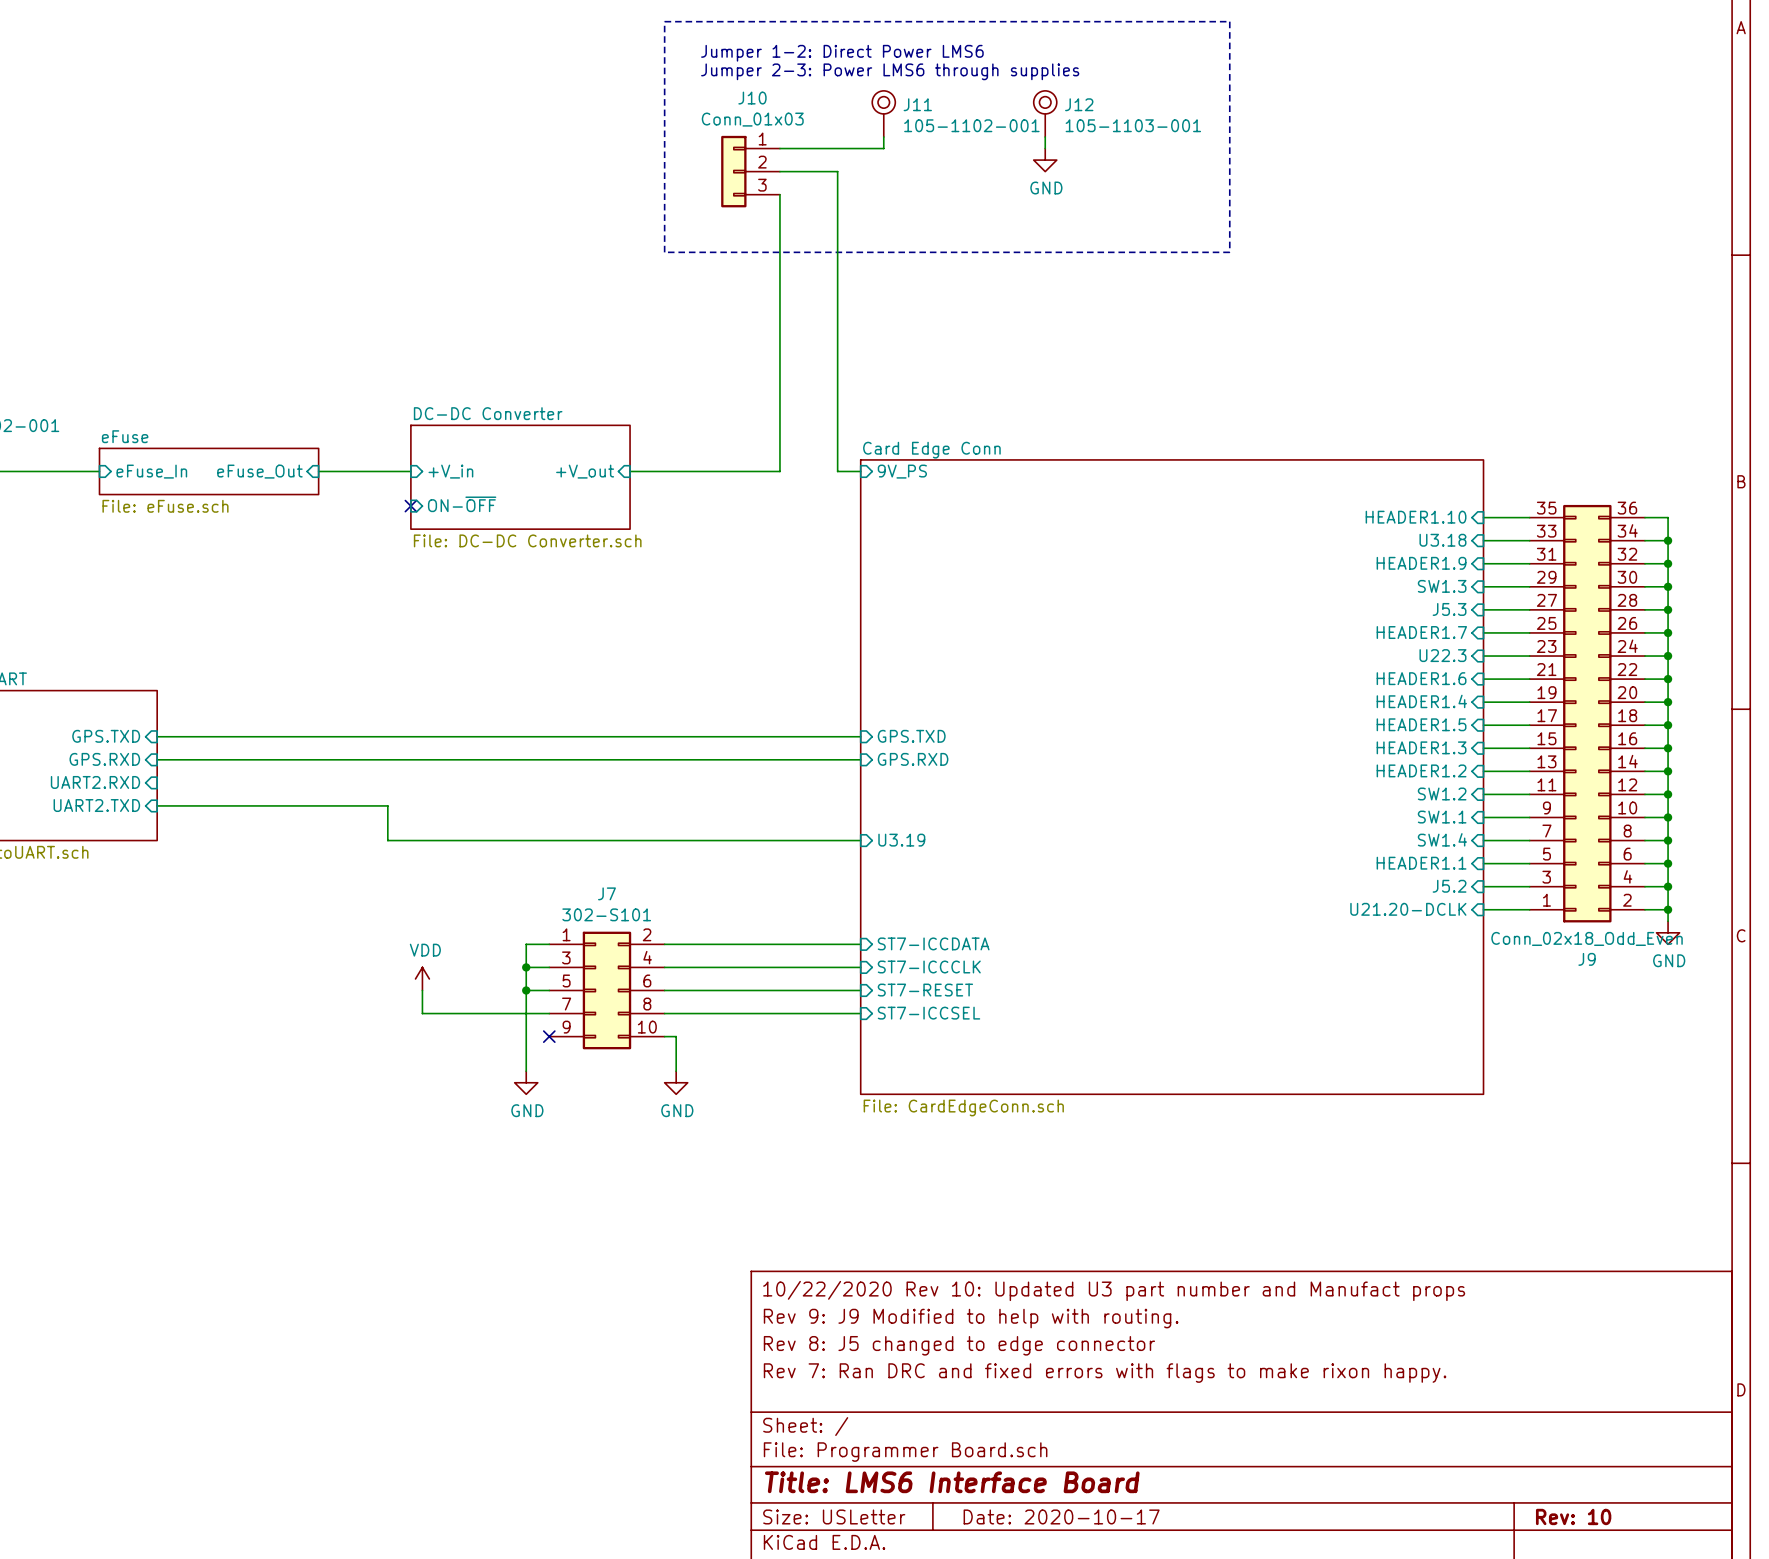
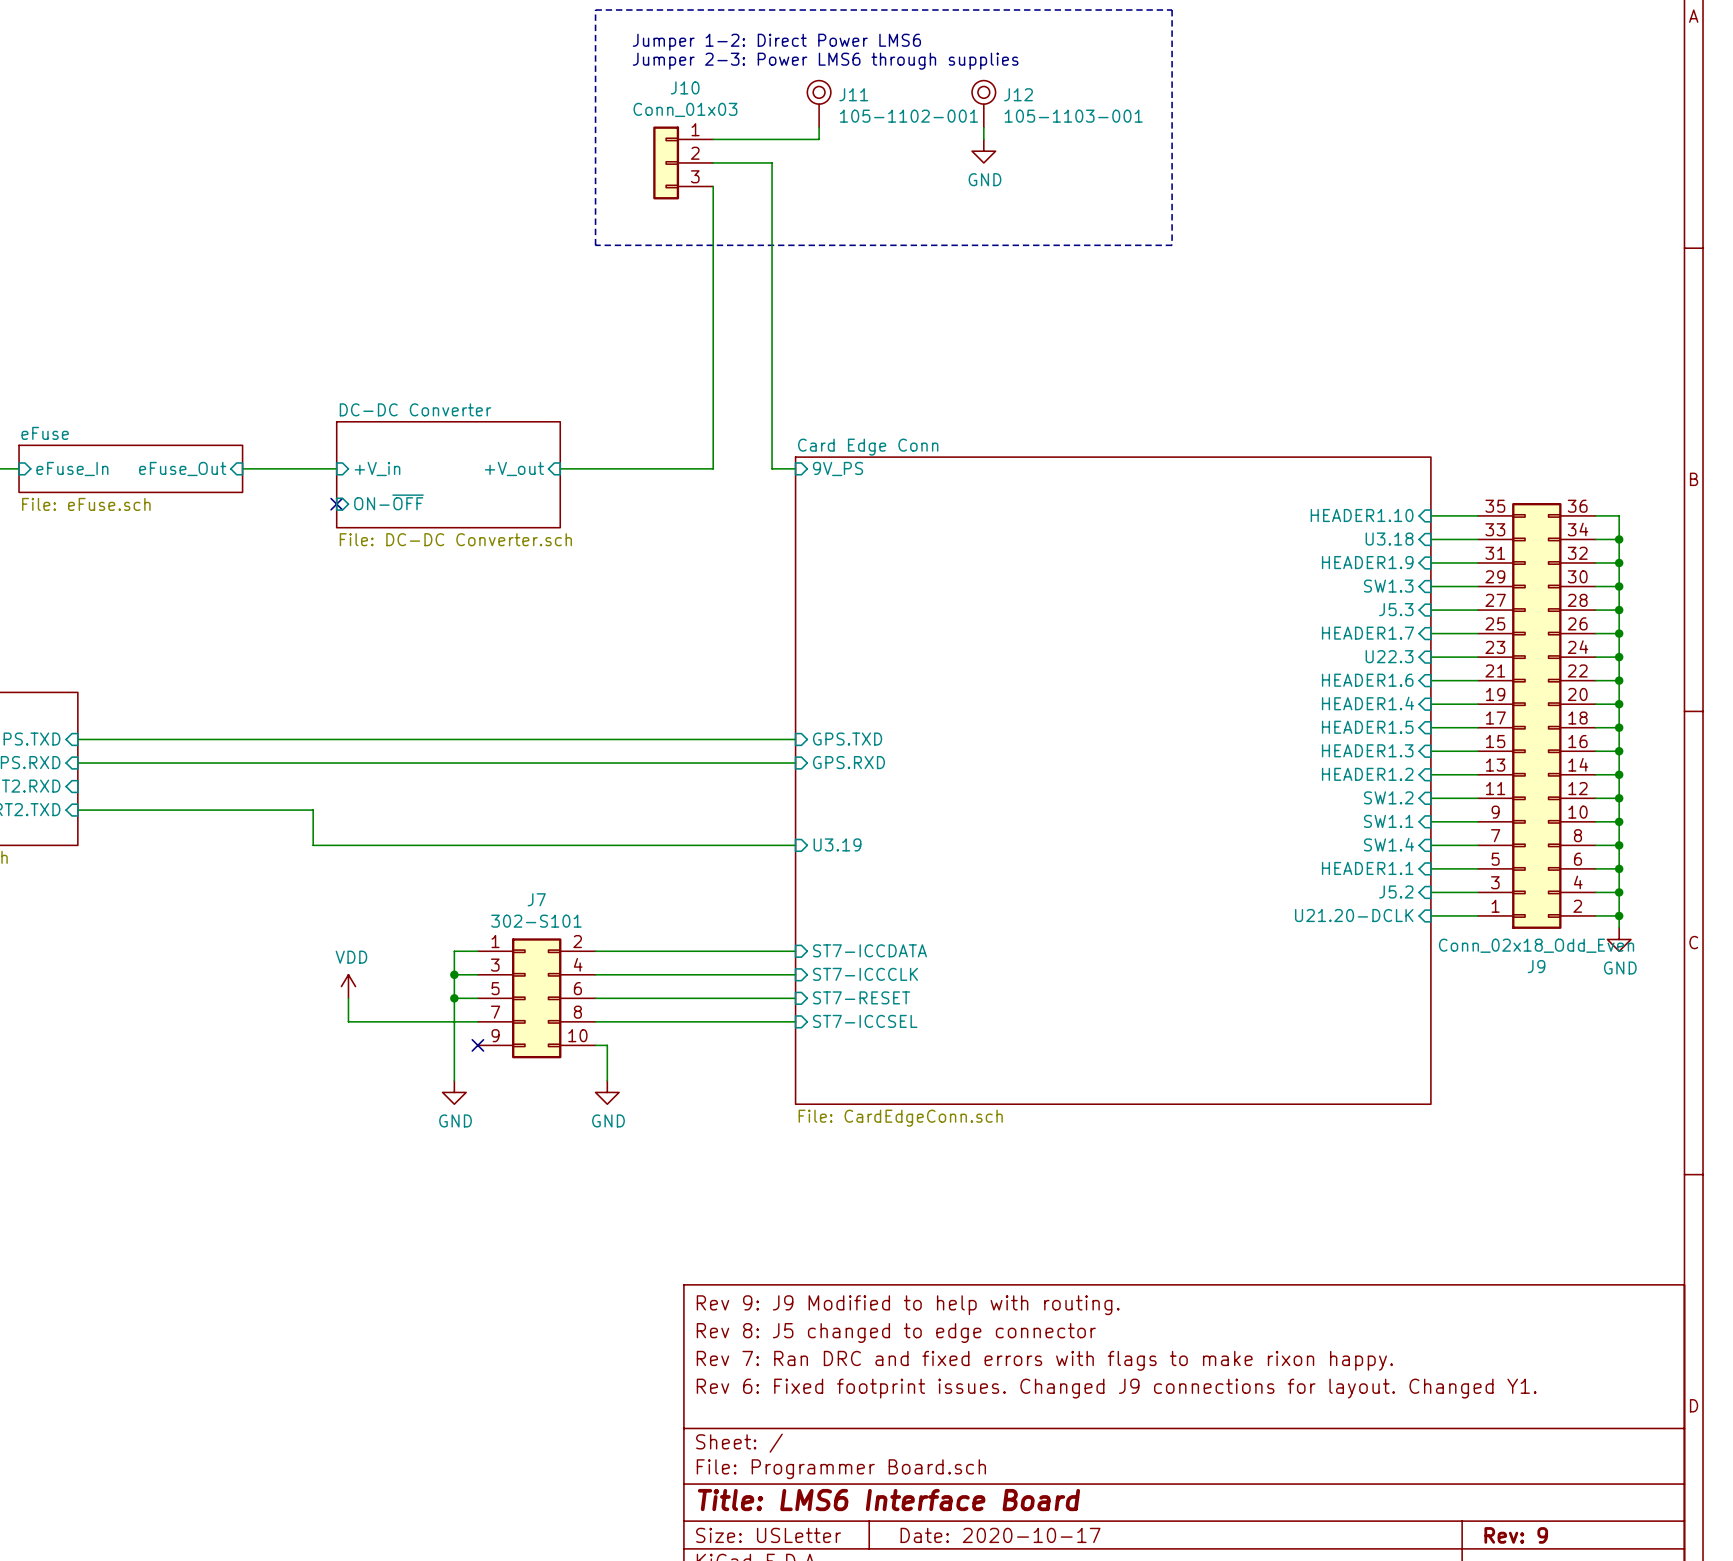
title block: 10/22/2020 Rev 10: Updated U3 part number and Manufact props (1114, 1290) -> Rev 9: J9 Modified to help with routing. (908, 1305)
title block: Rev 9: J9 Modified to help with routing. (971, 1318) -> Rev 8: J5 changed to edge connector (896, 1332)
title block: Rev 8: J5 changed to edge connector (959, 1345) -> Rev 7: Ran DRC and fixed errors with flags to make rixon happy. (1044, 1360)
title block: Rev 7: Ran DRC and fixed errors with flags to make rixon happy. (1105, 1373) -> Rev 6: Fixed footprint issues. Changed J9 connections for layout. Changed Y1. (1116, 1388)
title block: Rev: 10 (1573, 1516) -> Rev: 9 (1516, 1535)

